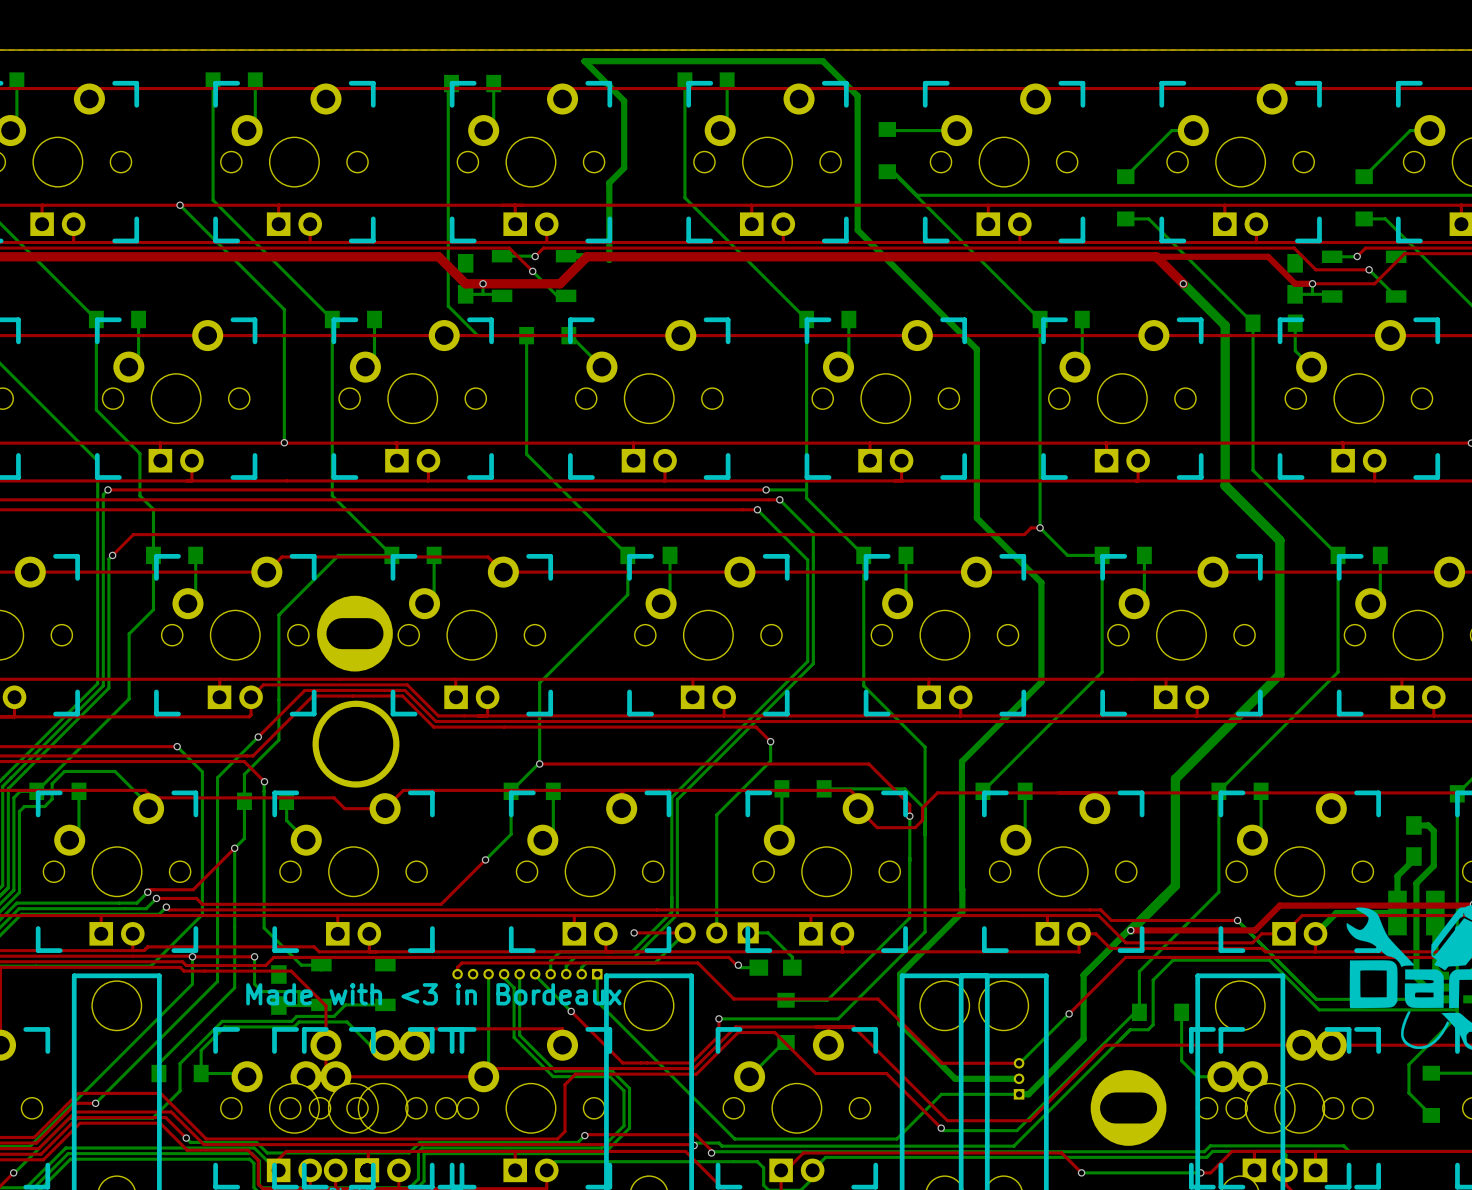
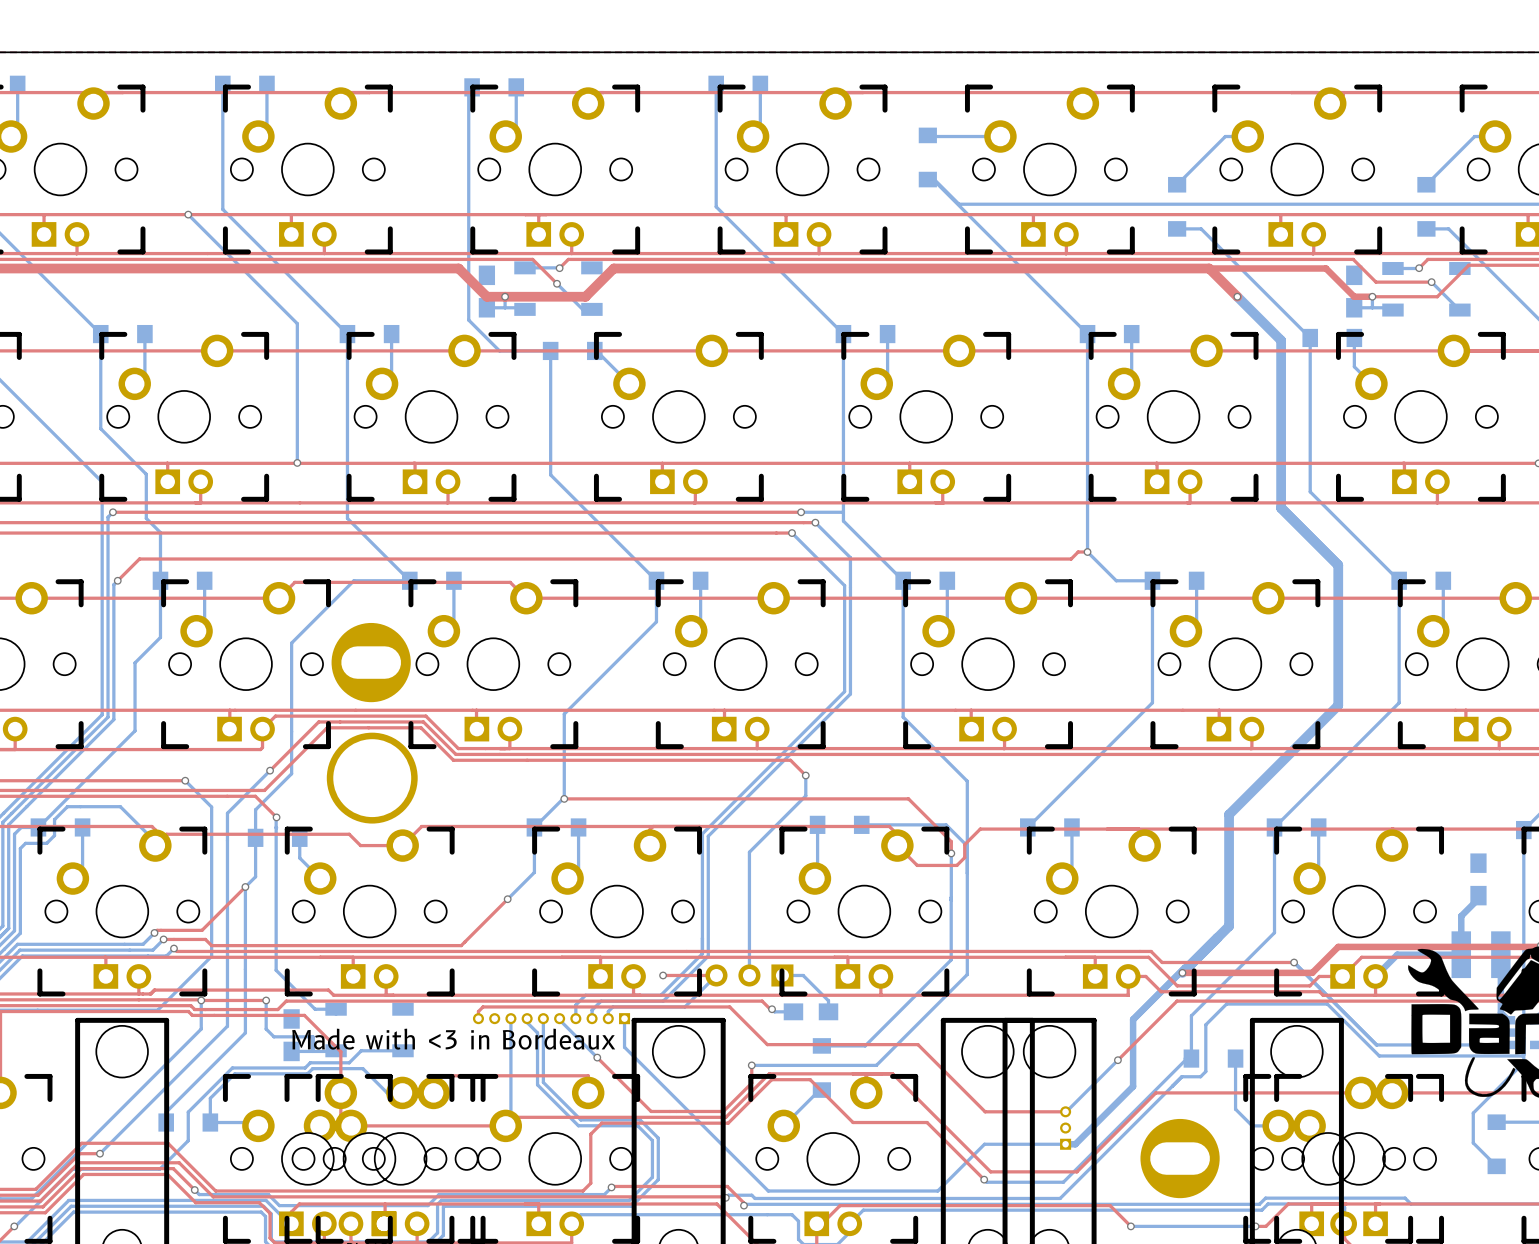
bottom track: (566, 256) (605, 256) (609, 259) (609, 182) (624, 167) (624, 100) (584, 61) (822, 61) (857, 95) (857, 230) (976, 349) (976, 518) (1041, 582) (1041, 682) (961, 761) (962, 912) (900, 974) (900, 1023) (955, 1078) (1019, 1078) -> none
bottom track: (1413, 825) (1428, 825) (1433, 831) (1433, 865) (1416, 883) (1416, 977) (1426, 987) (1442, 987) -> none

